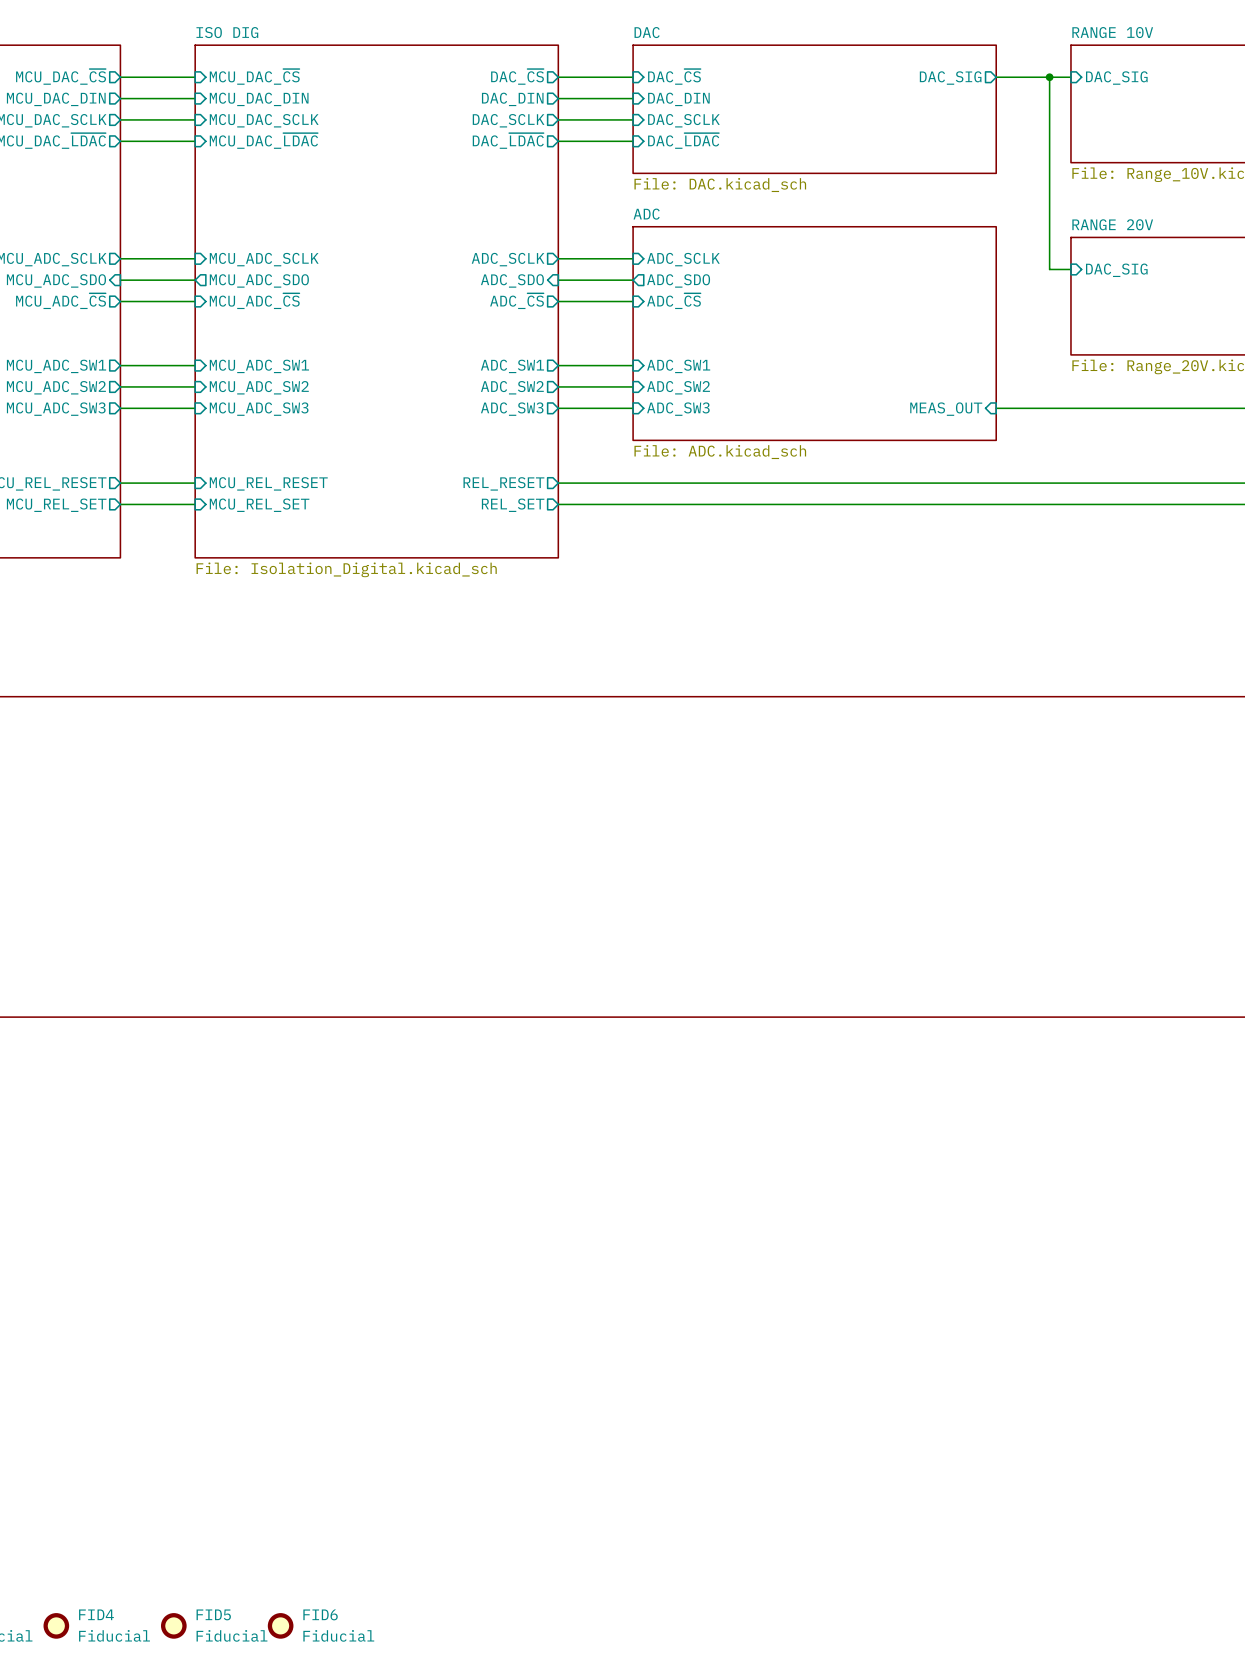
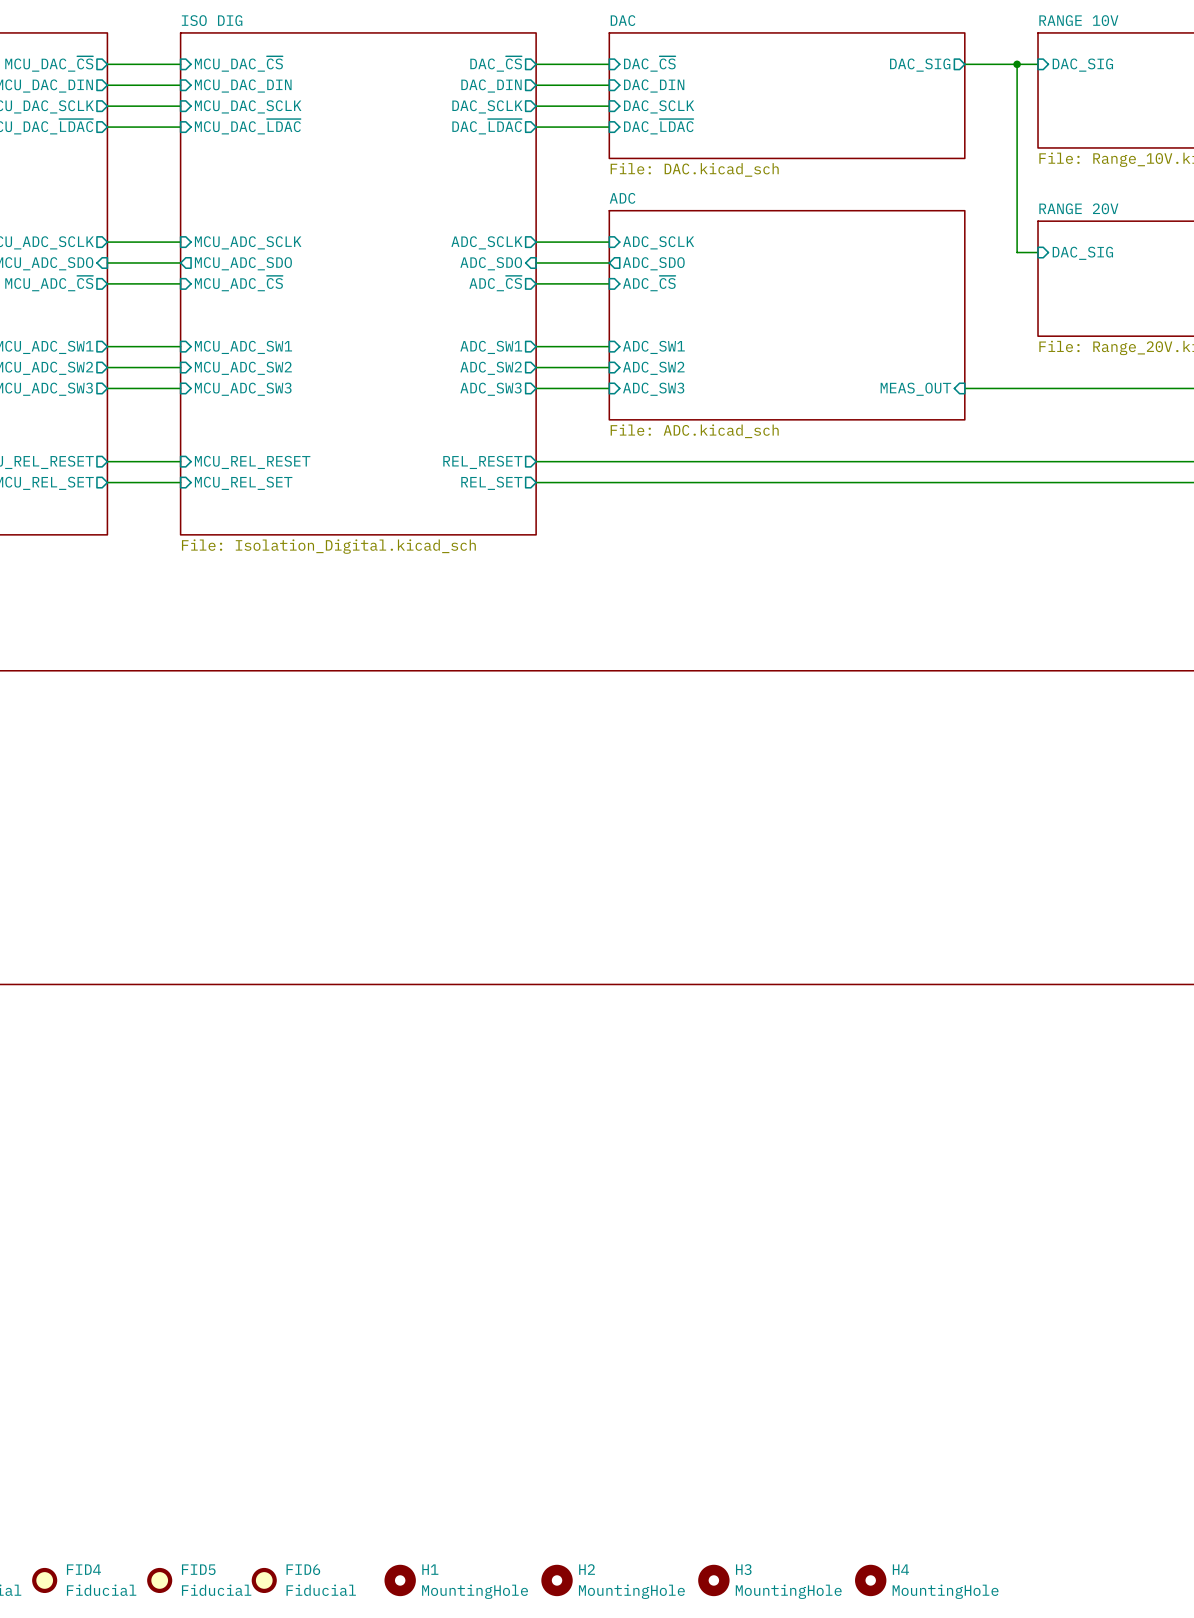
H1: none -> MountingHole (400, 1580)
H2: none -> MountingHole (557, 1580)
H3: none -> MountingHole (713, 1580)
H4: none -> MountingHole (870, 1580)

